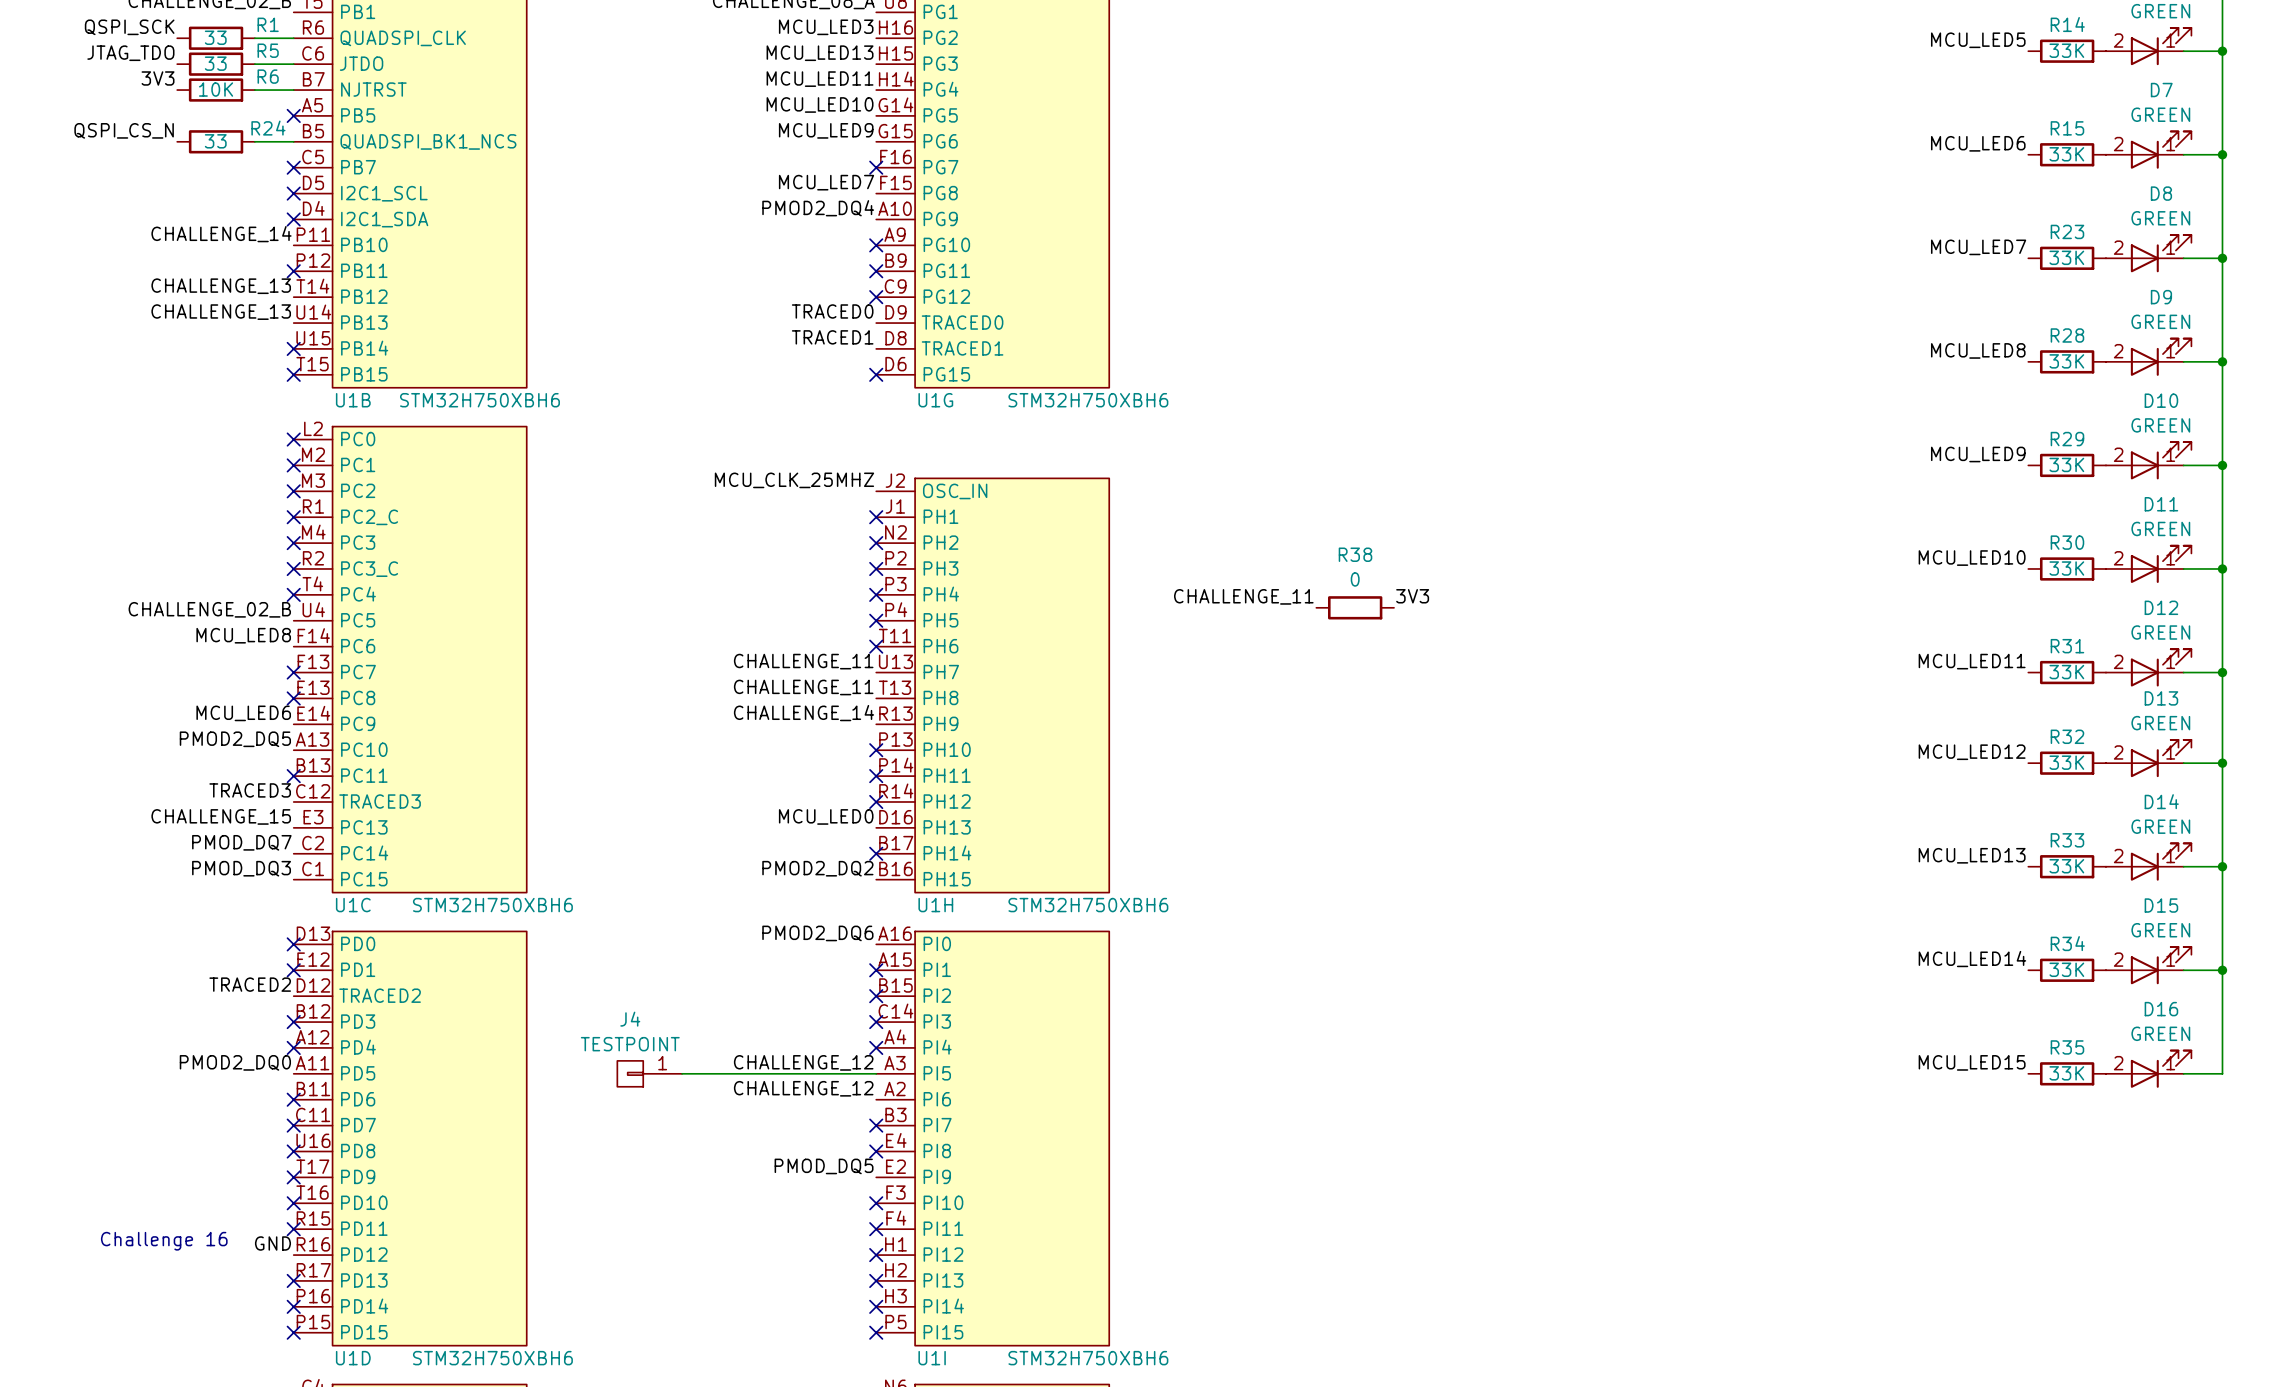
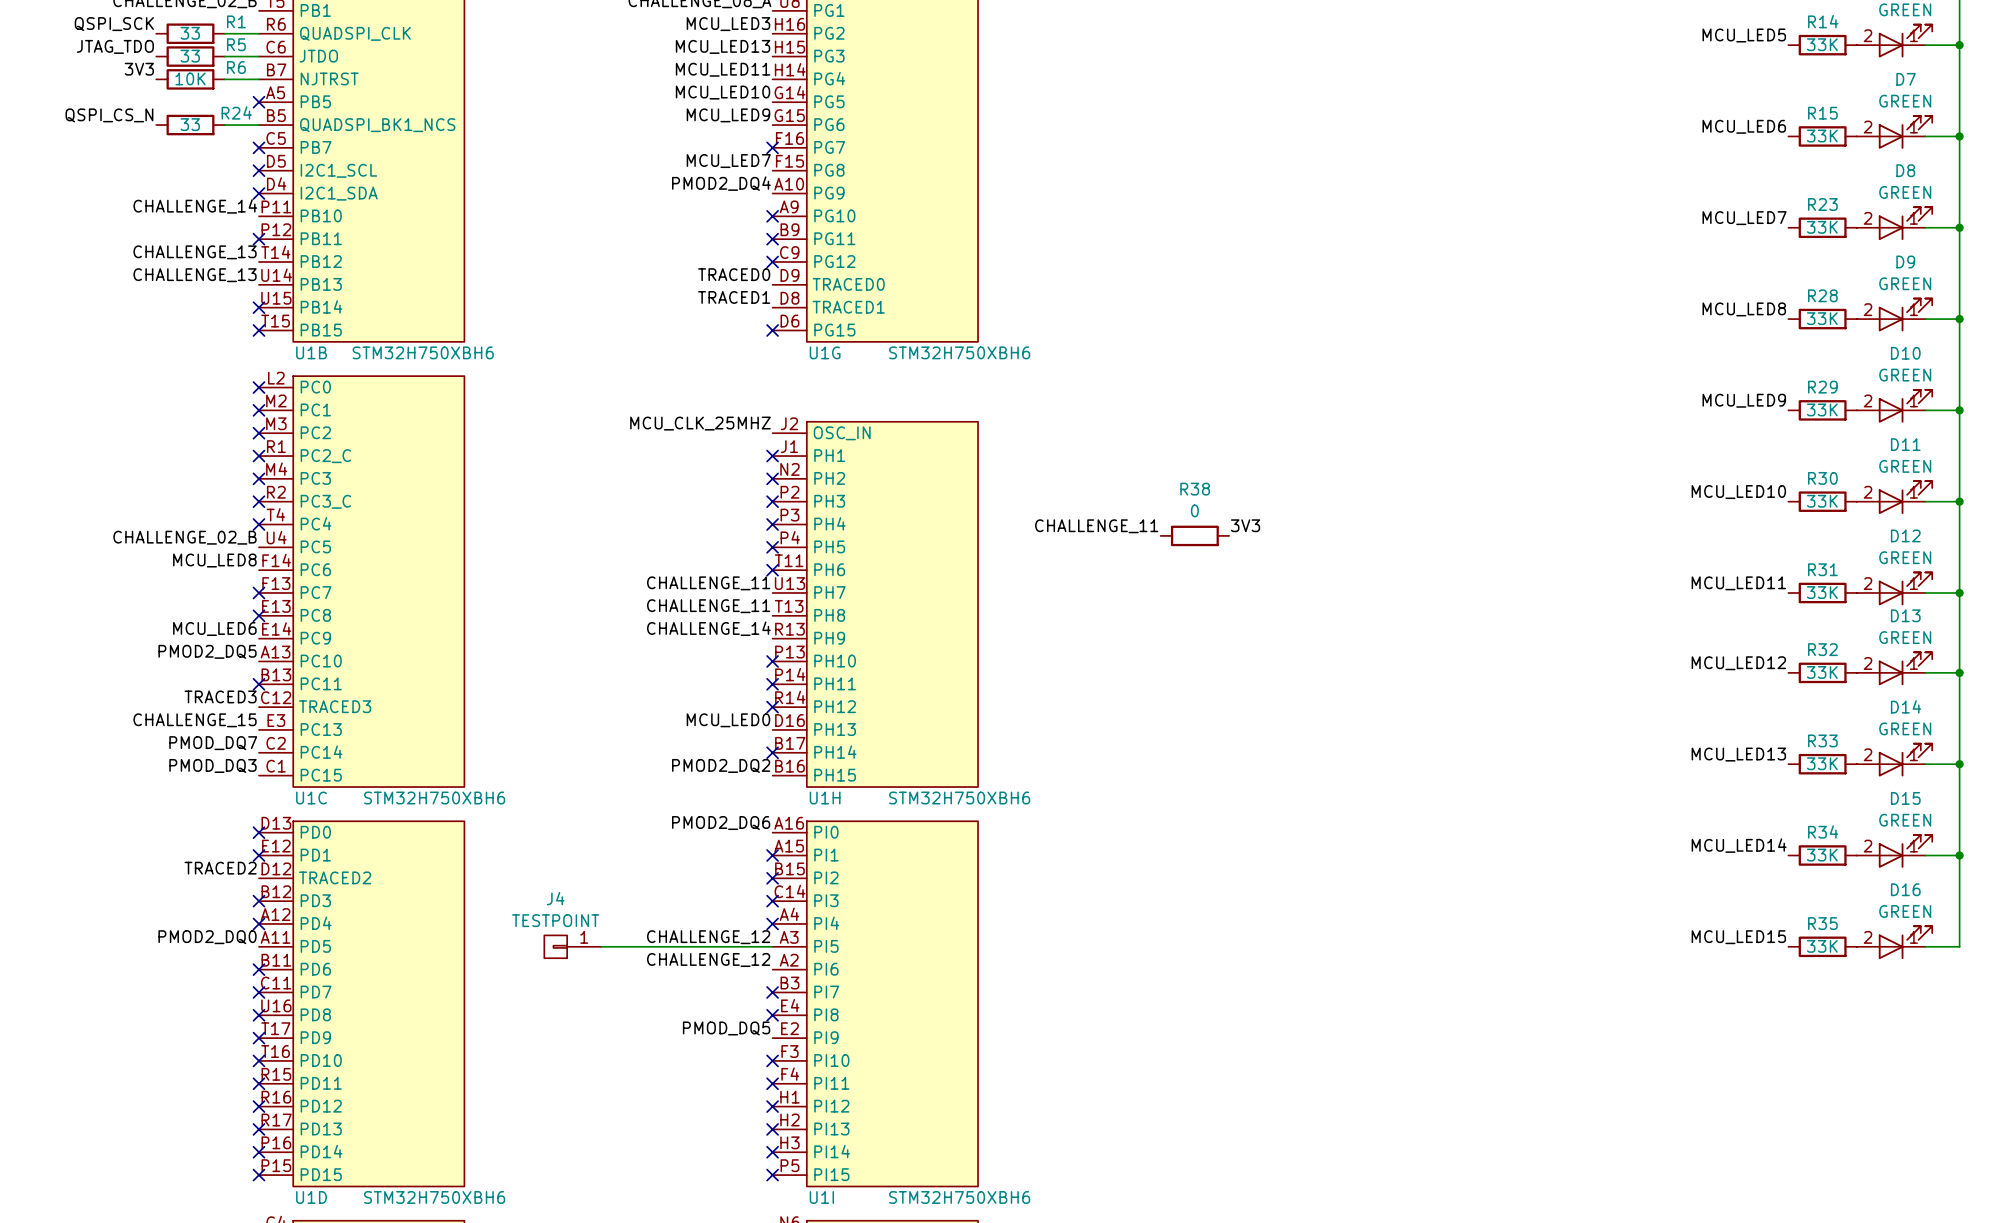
text: Challenge 16 (164, 1241) -> none
label: GND (272, 1243) -> none
no-connect mark: none -> (258, 1106)

